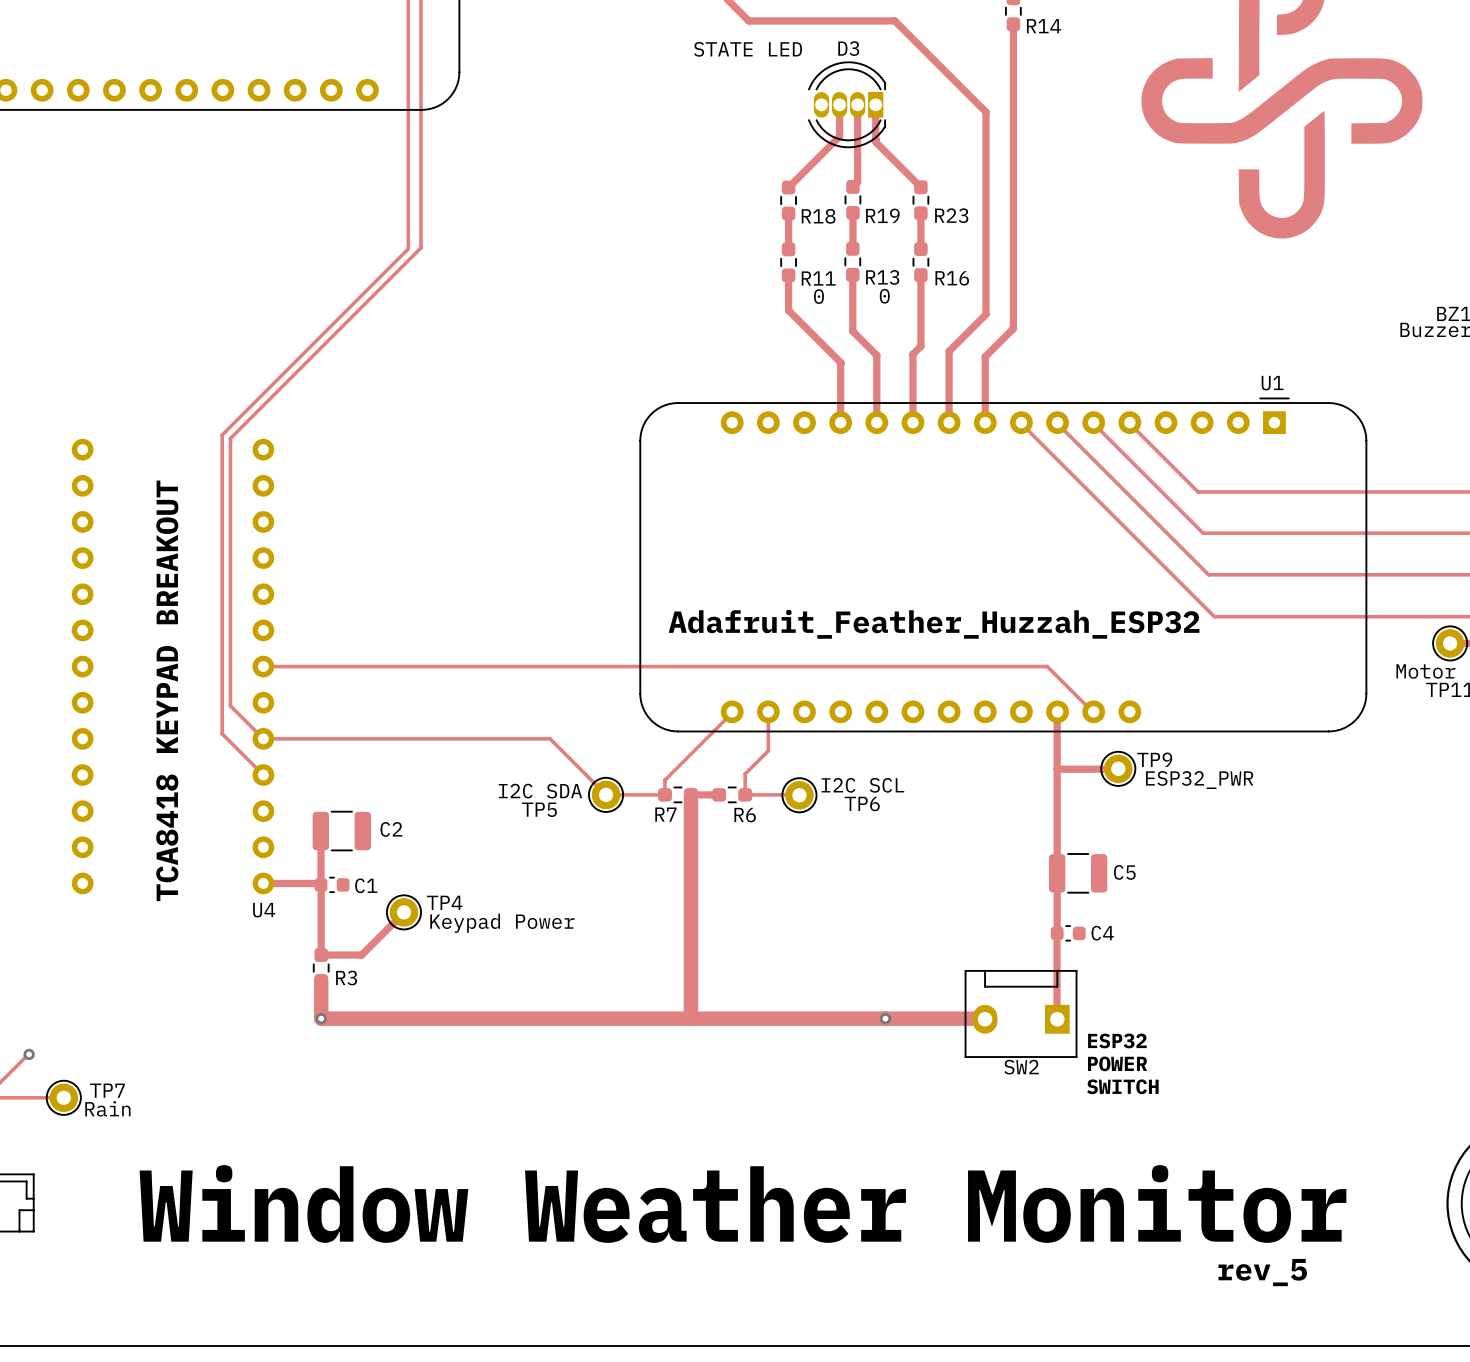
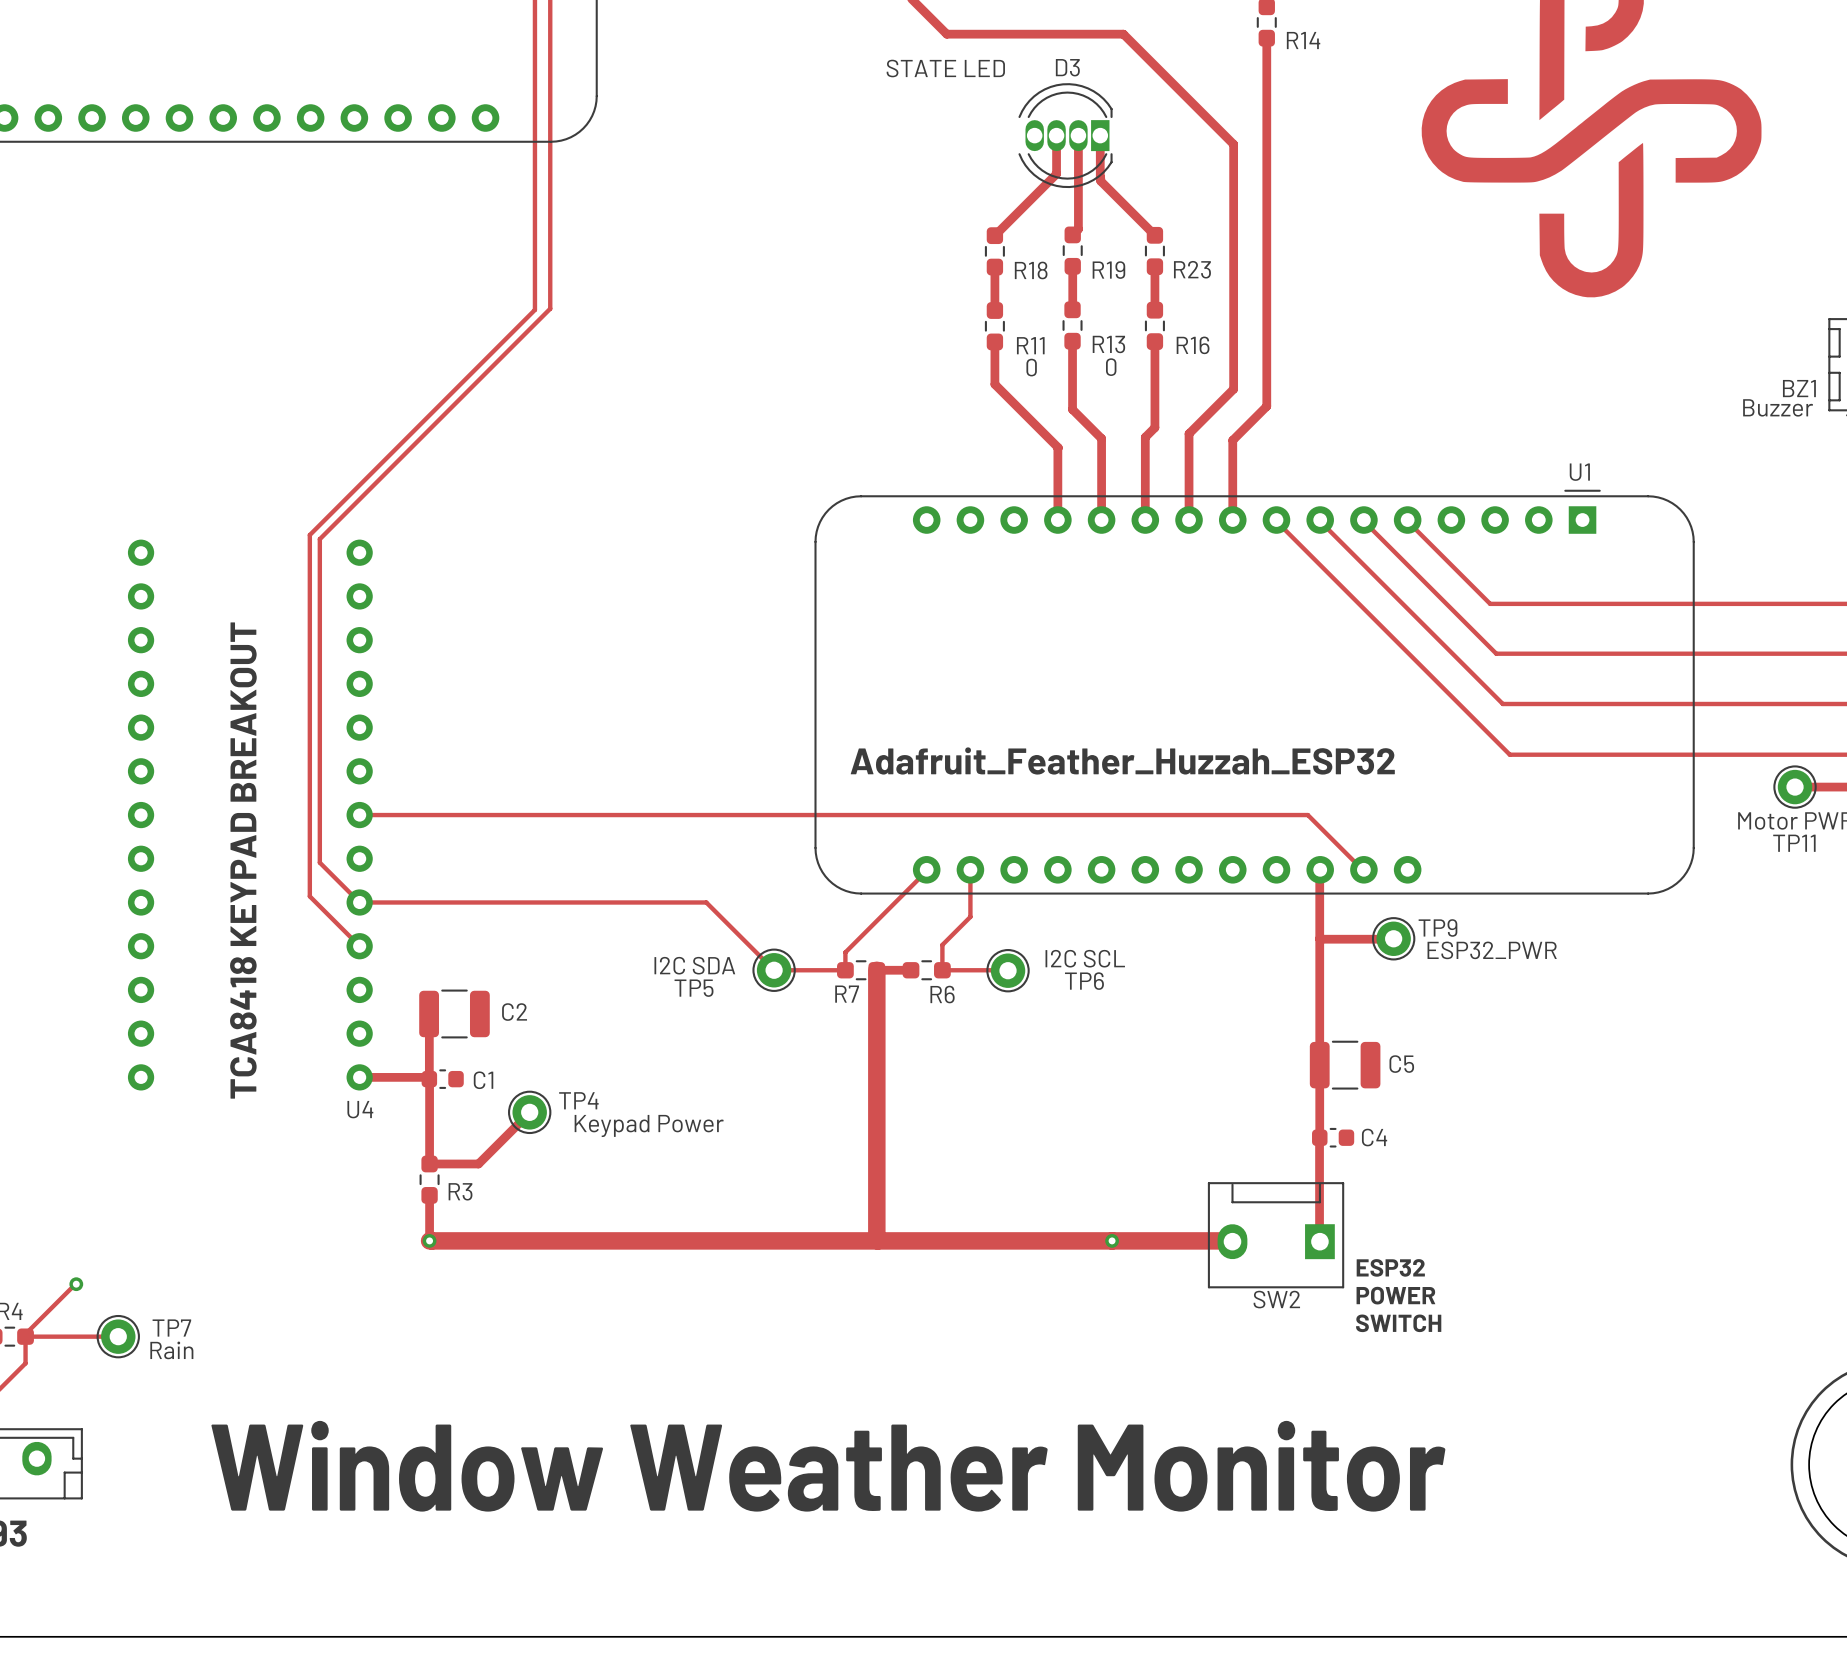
track width: thick (321, 981) (321, 1018) -> thin (429, 1195) (429, 1240)
text: rev_5 (1262, 1272) -> none

